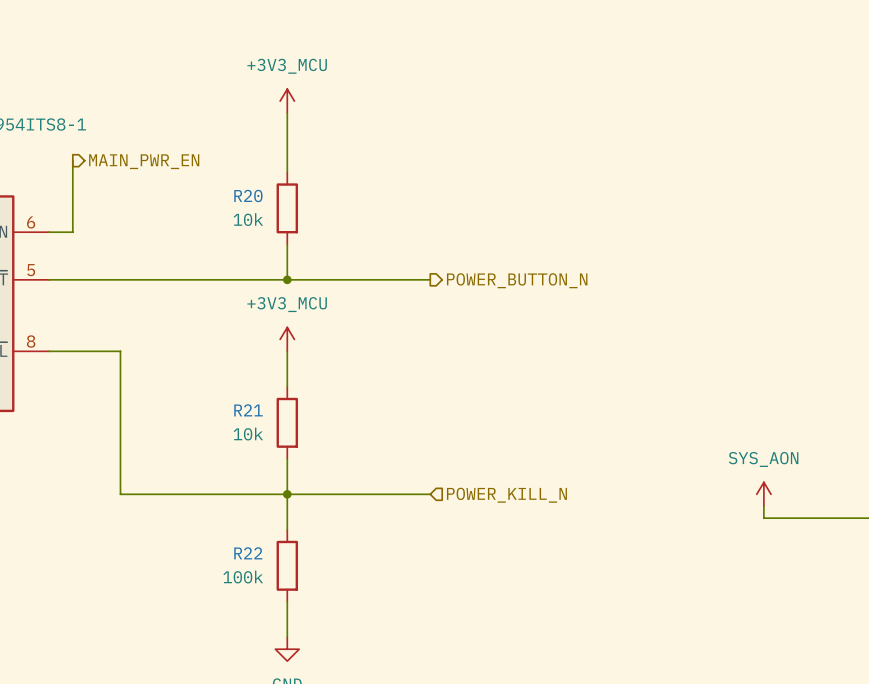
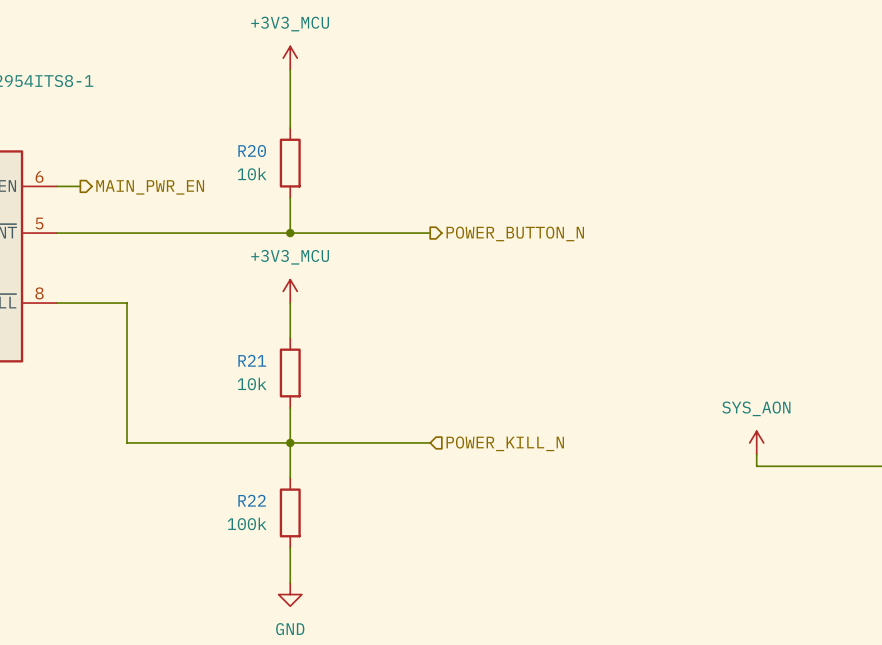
wire: (72, 160) (72, 232) -> none
hierarchical label position: MAIN_PWR_EN (144, 161) -> MAIN_PWR_EN (150, 187)

